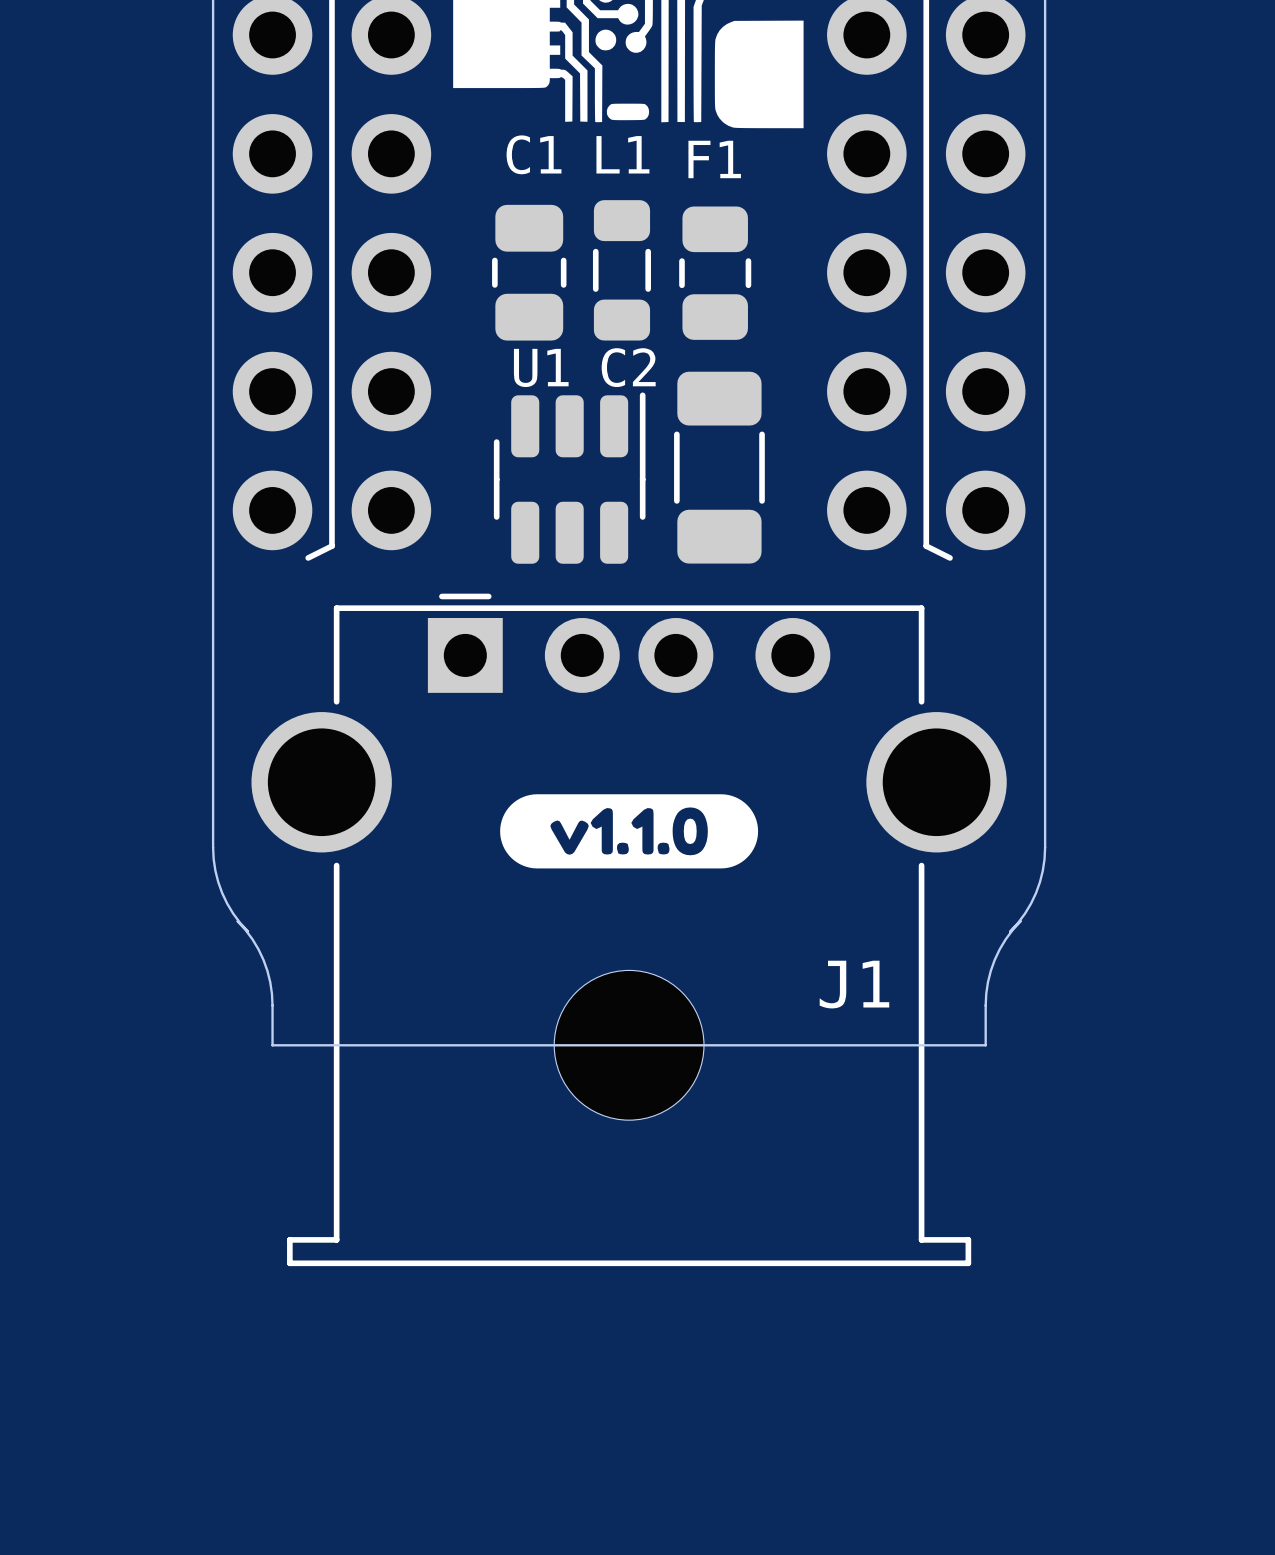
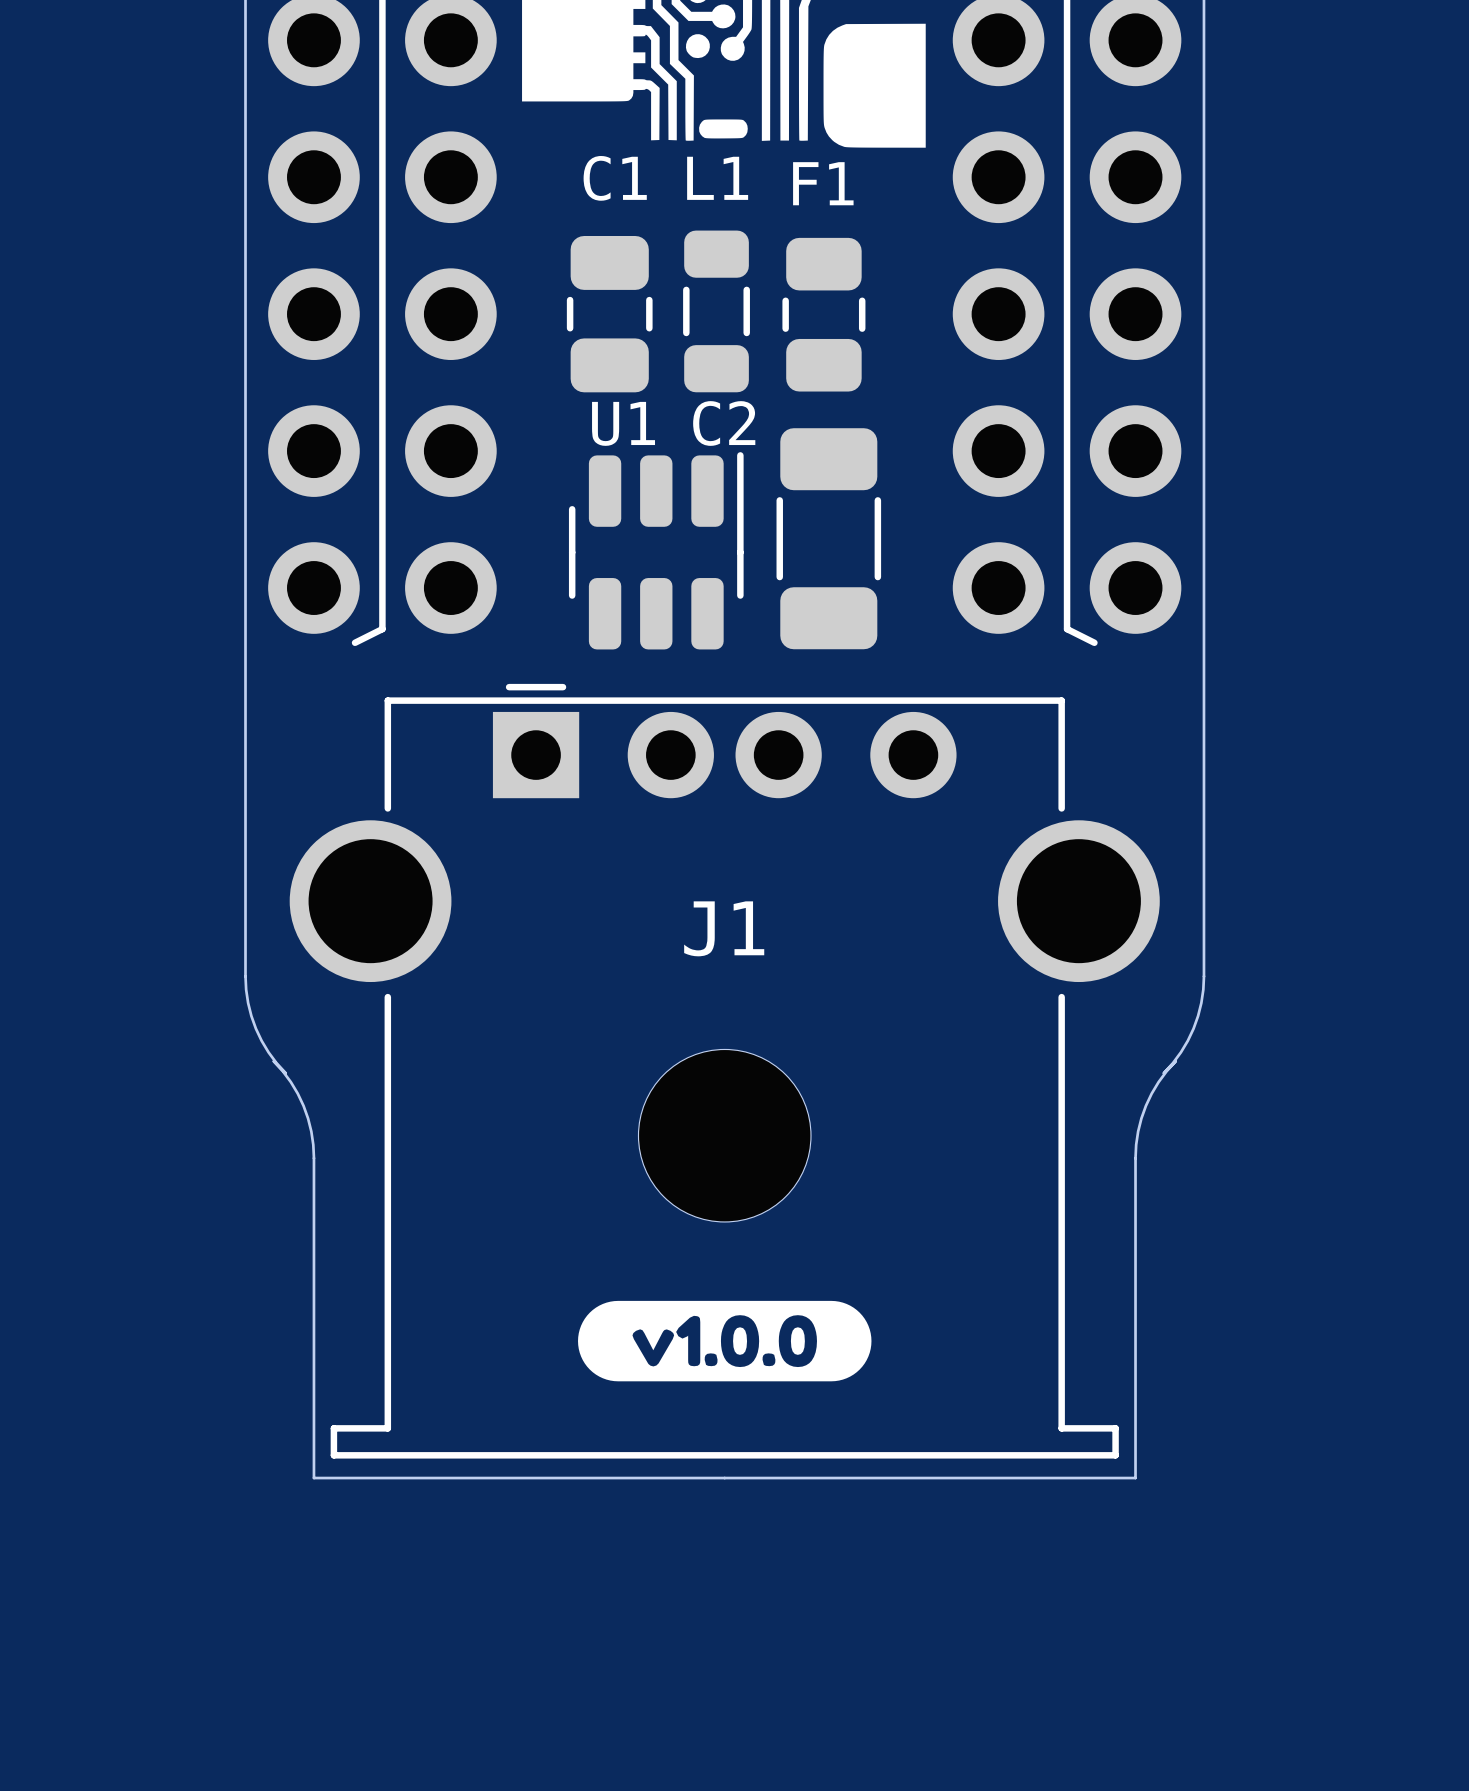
drawing: [500, 794, 759, 869] -> none
J1 name position: J1 (854, 984) -> J1 (724, 928)
board edge: (272, 1045) (985, 1045) -> (313, 1204) (313, 1478) (1135, 1478) (1135, 1204)
part position: (629, 1045) -> (724, 1135)
drawing: none -> [578, 1300, 872, 1382]

